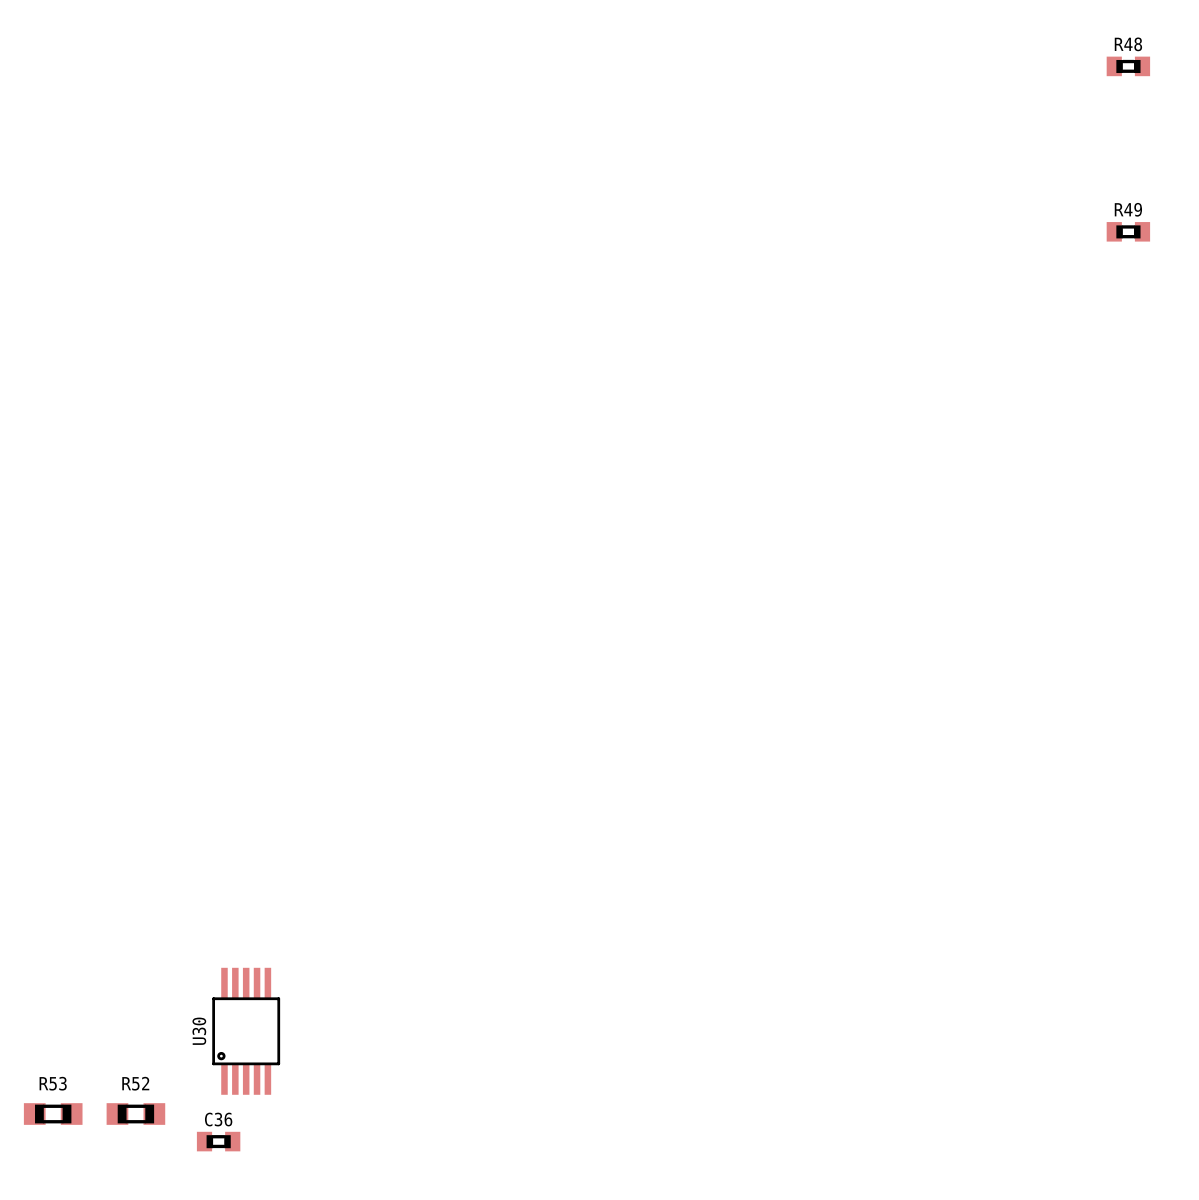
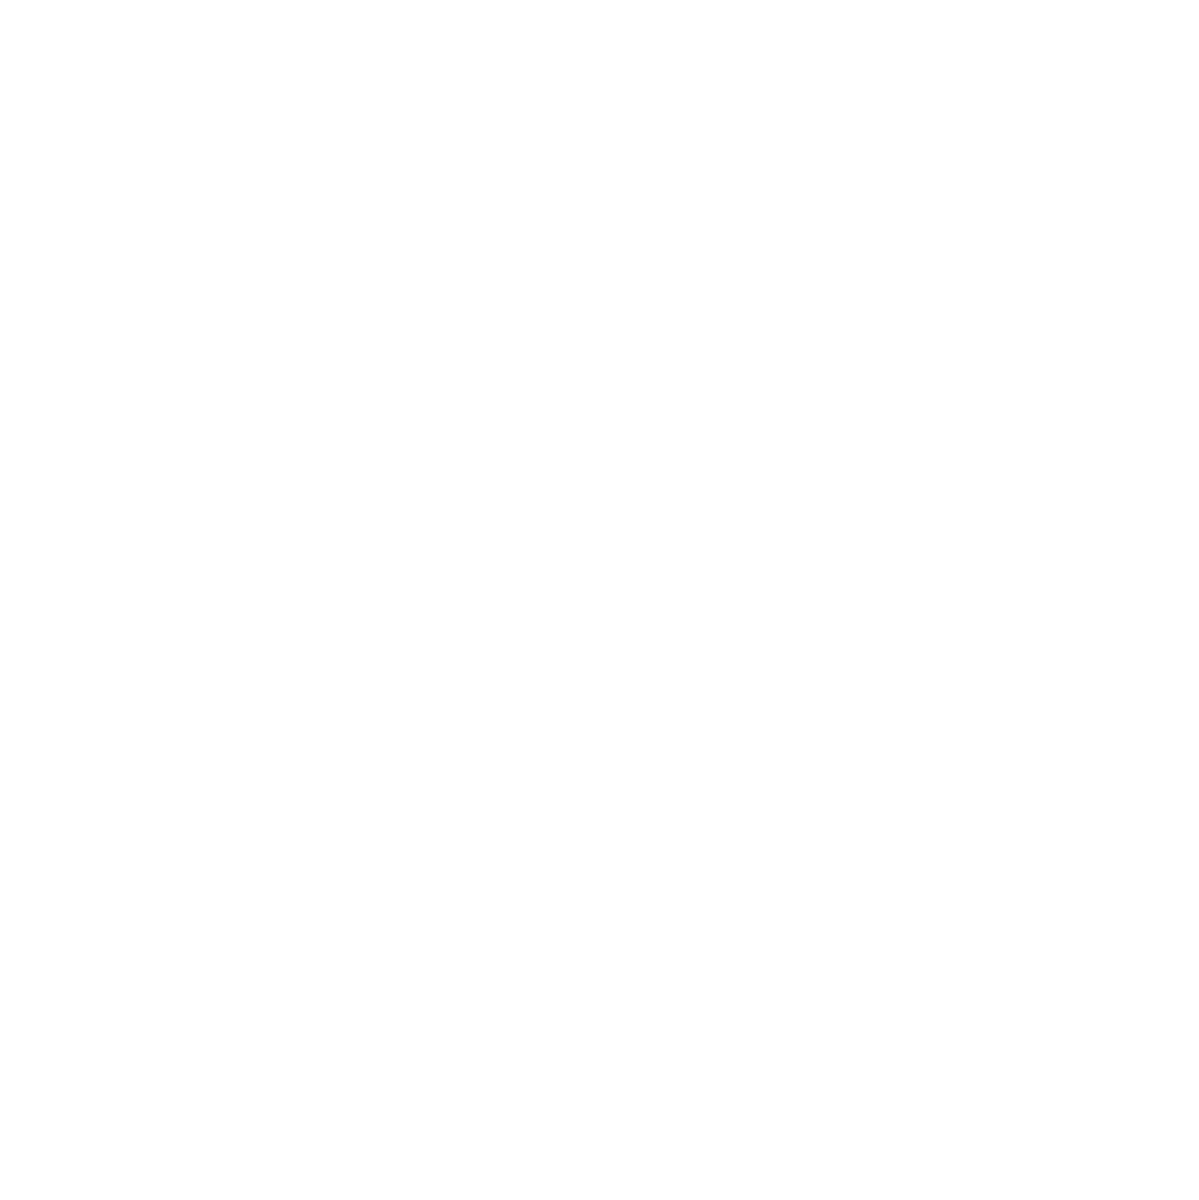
R48: (1128, 66) -> none
R49: (1128, 231) -> none
U30: (246, 1031) -> none
R53: (53, 1114) -> none
R52: (135, 1114) -> none
C36: (218, 1141) -> none

